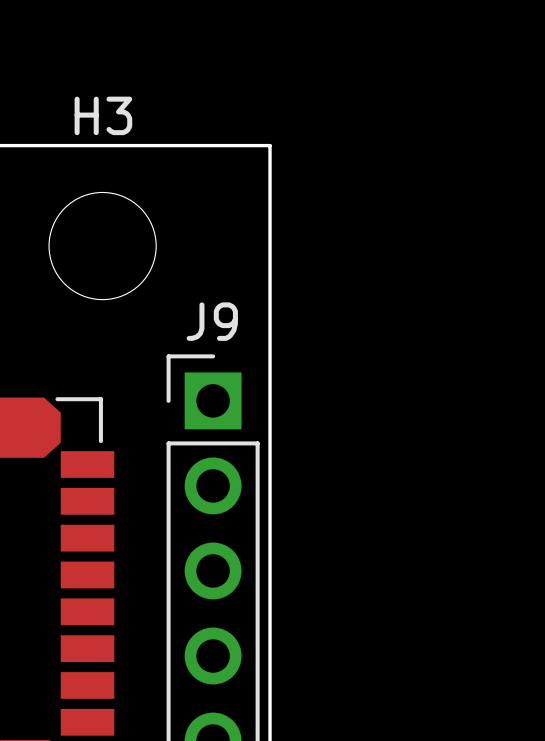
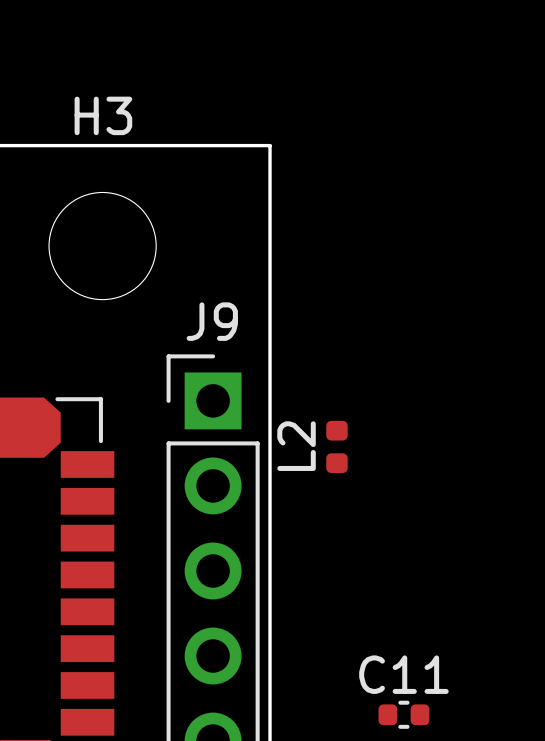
L2: none -> (336, 446)
C11: none -> (403, 714)

